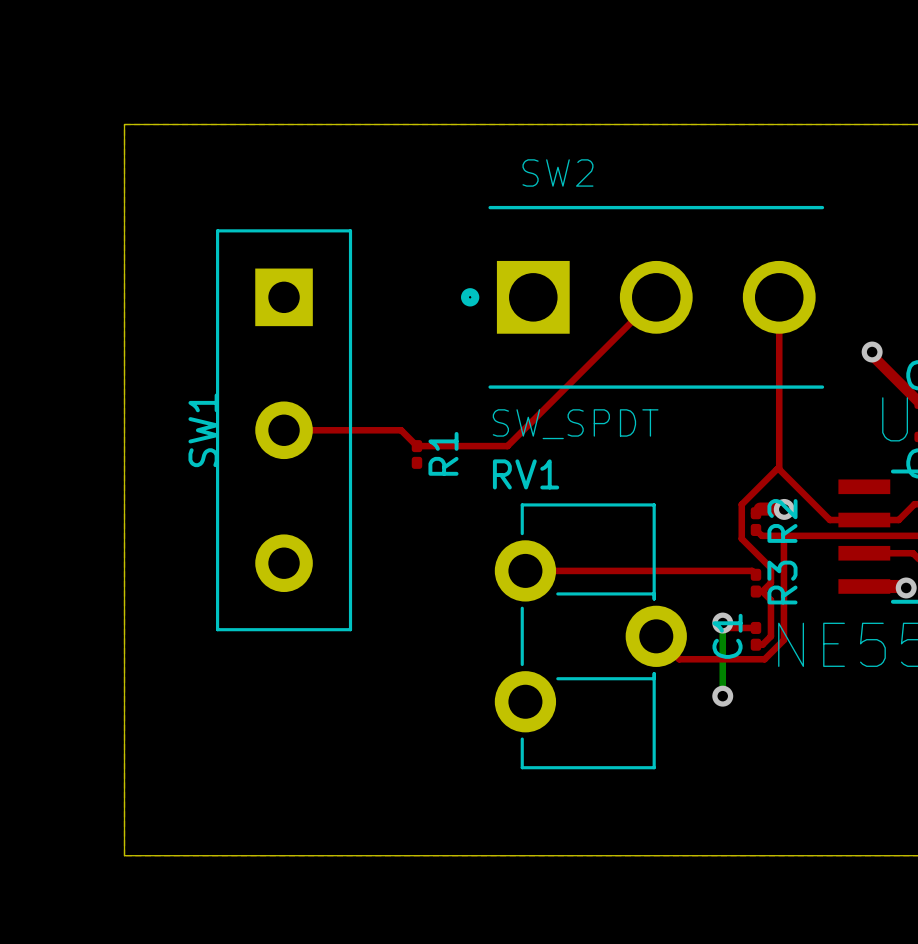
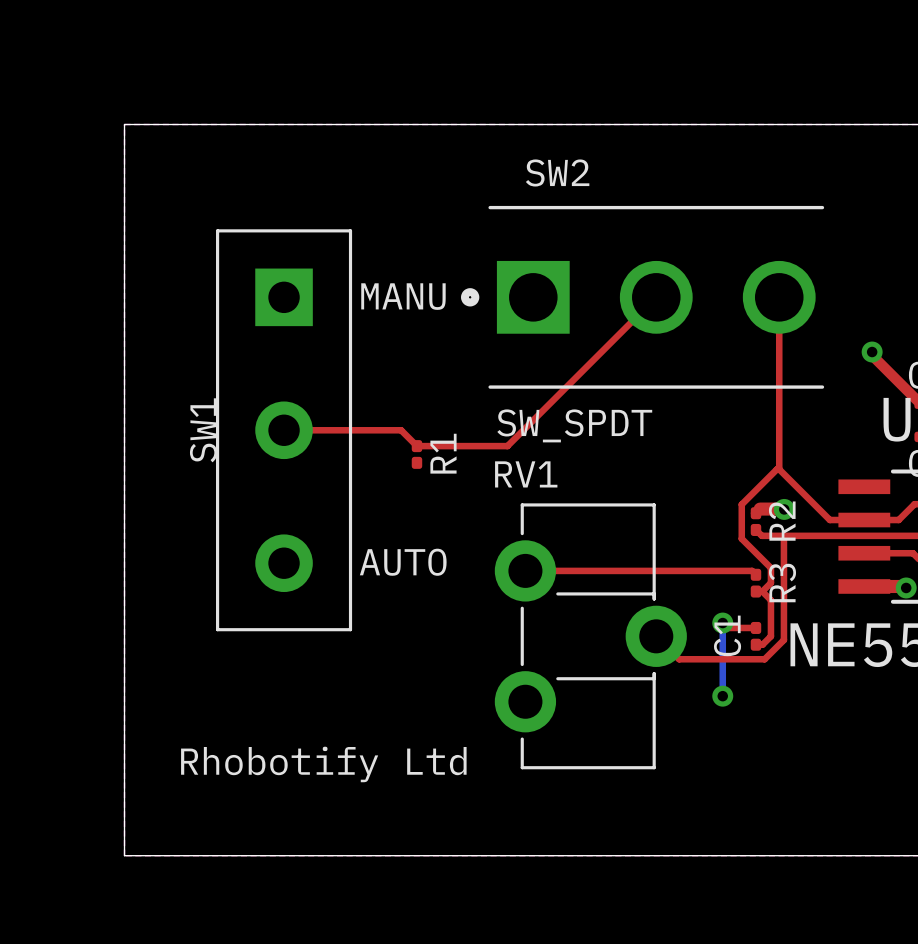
text: none -> MANU (403, 296)
text: none -> AUTO (403, 562)
text: none -> Rhobotify Ltd (323, 764)

